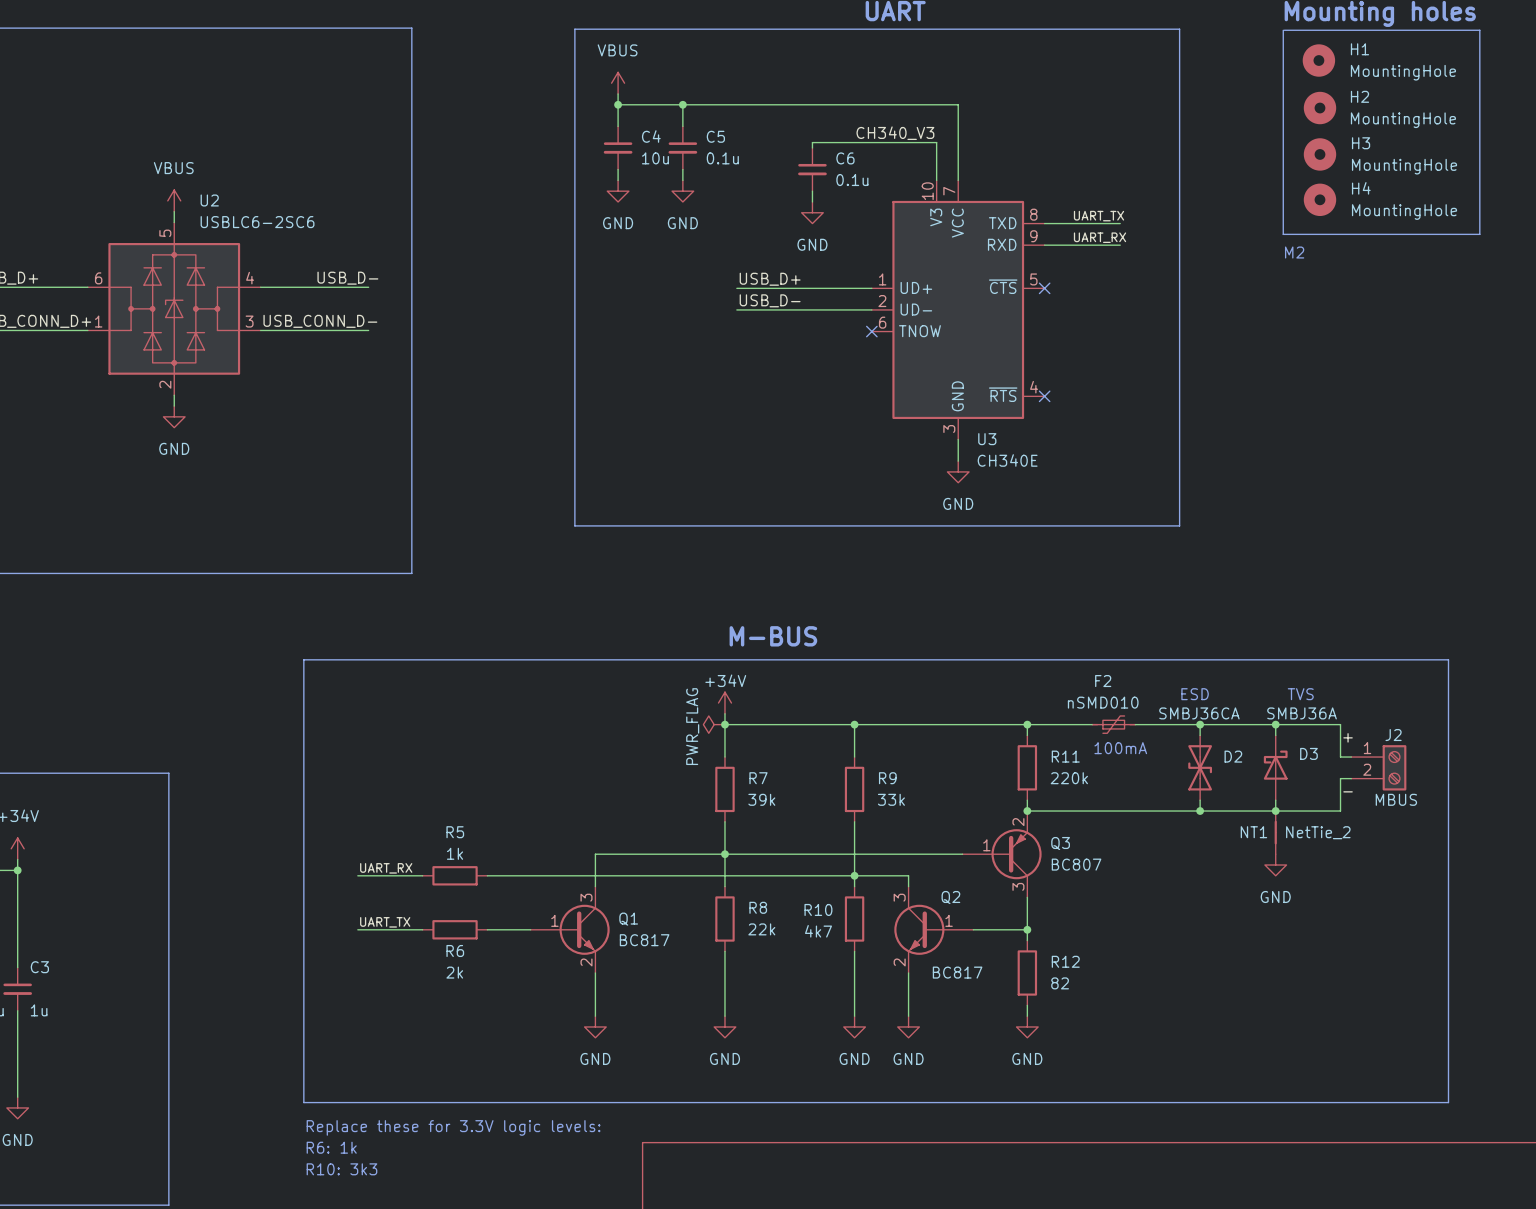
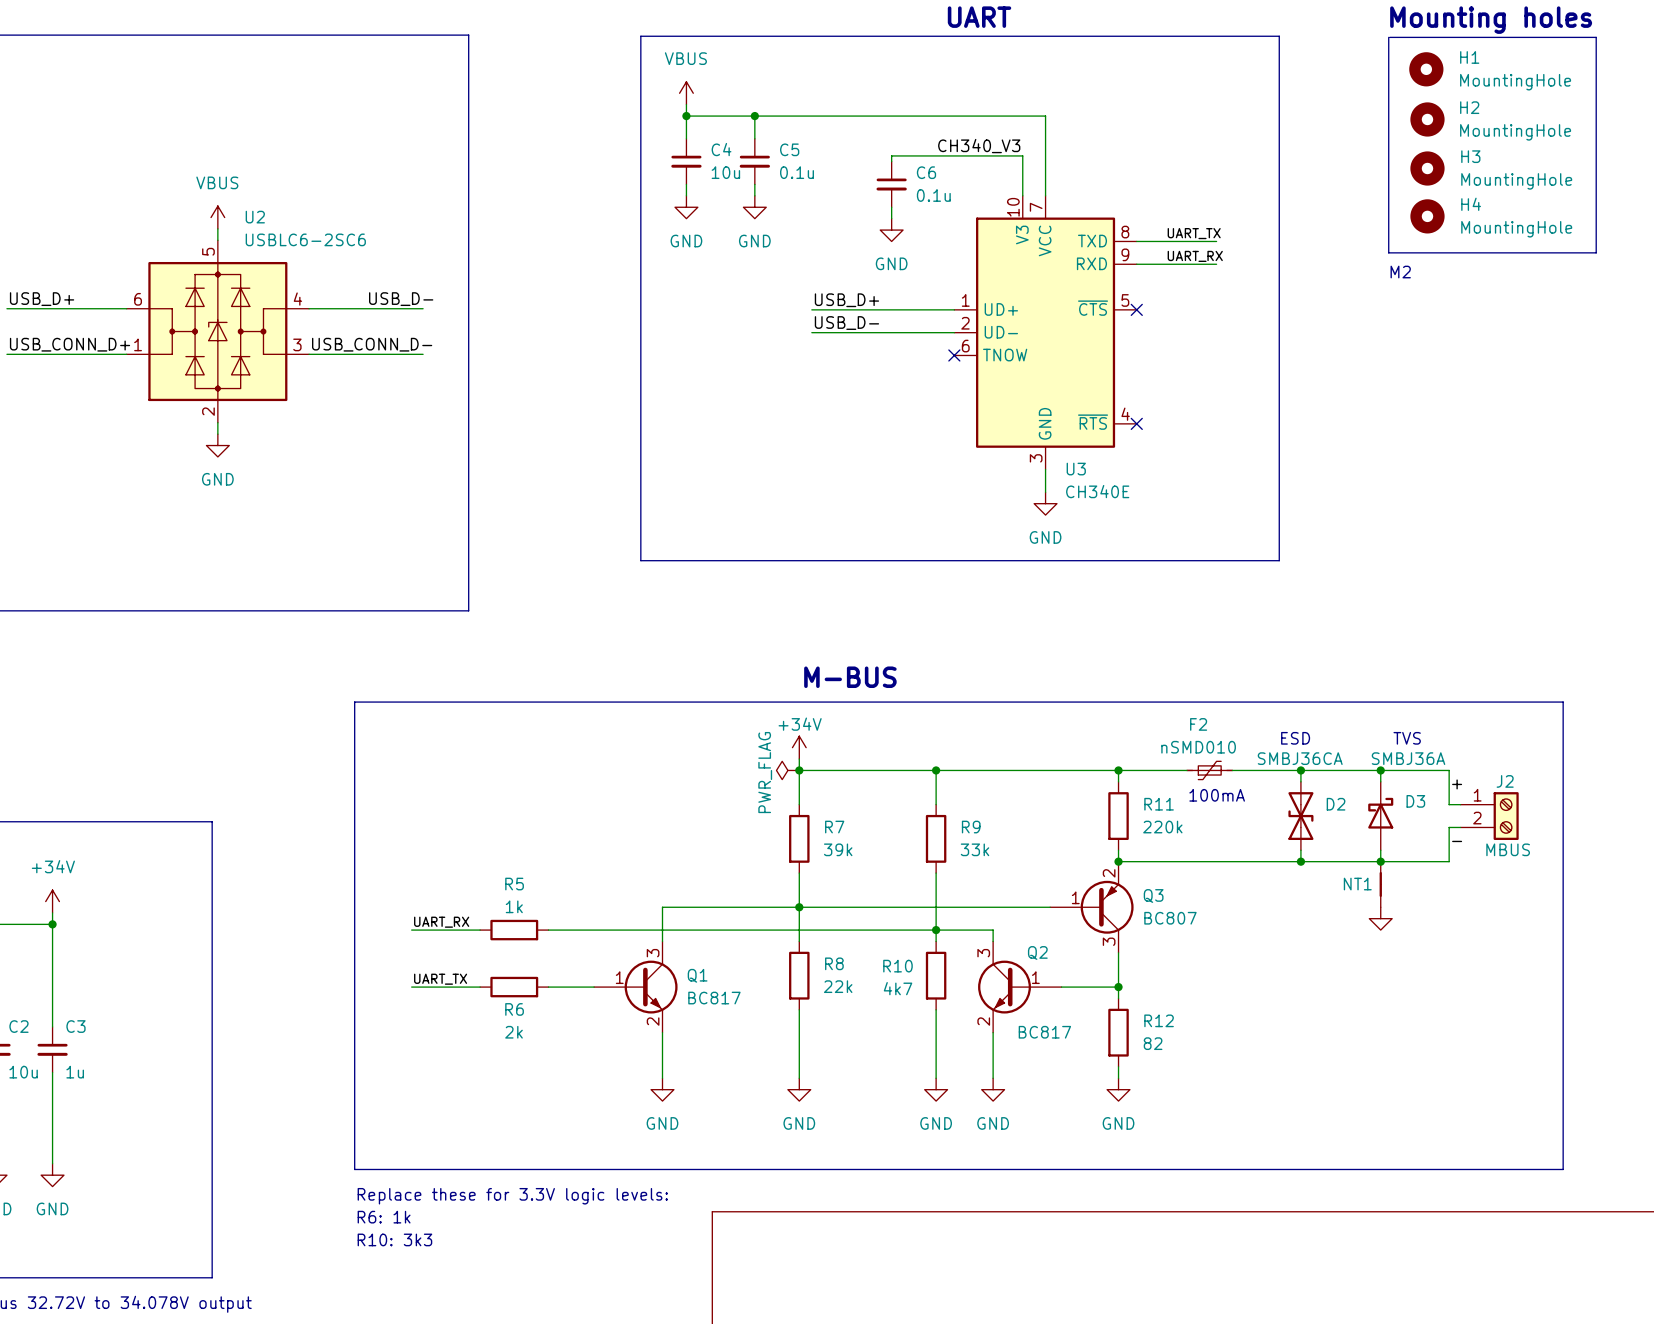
NT1 value: NetTie_2 (1318, 832) -> none
power symbol text: GND (1275, 897) -> none

